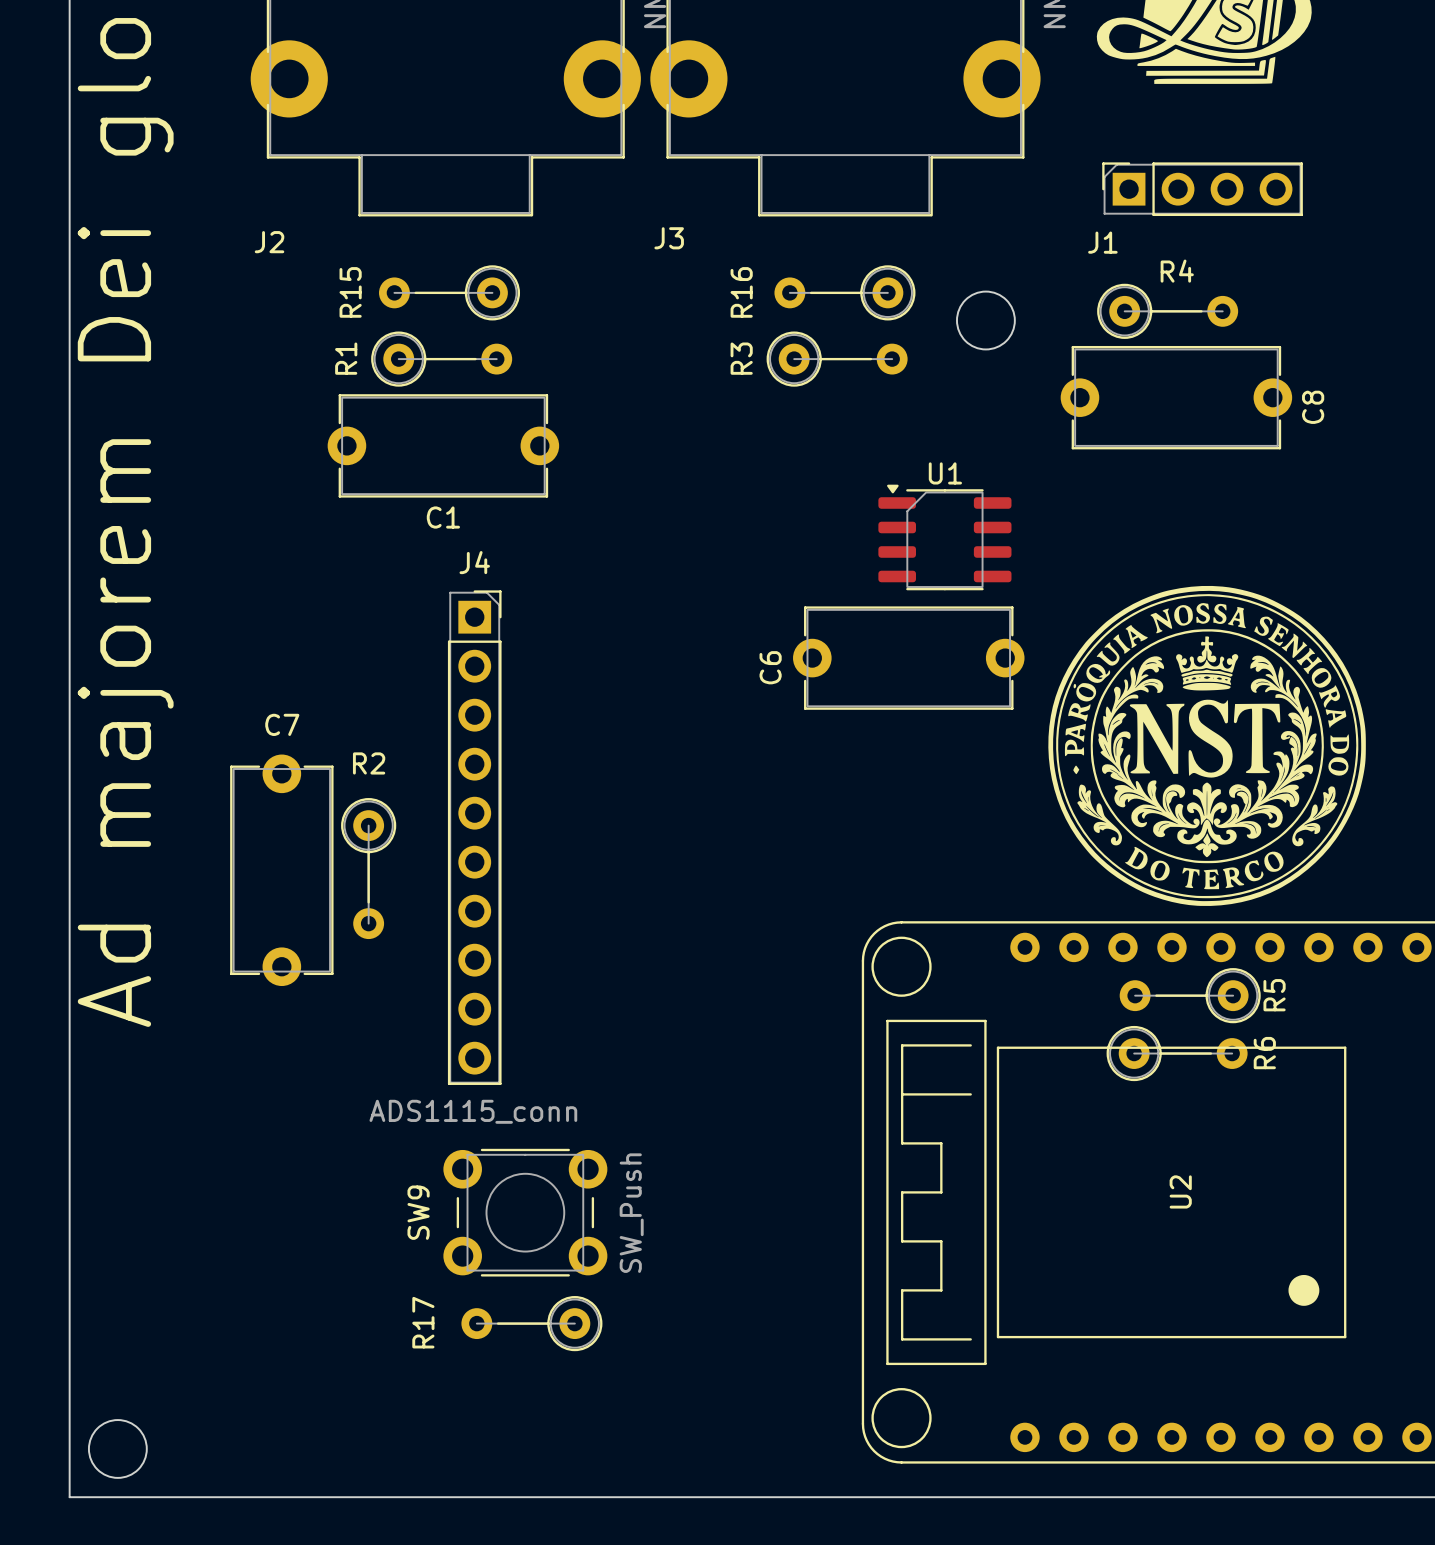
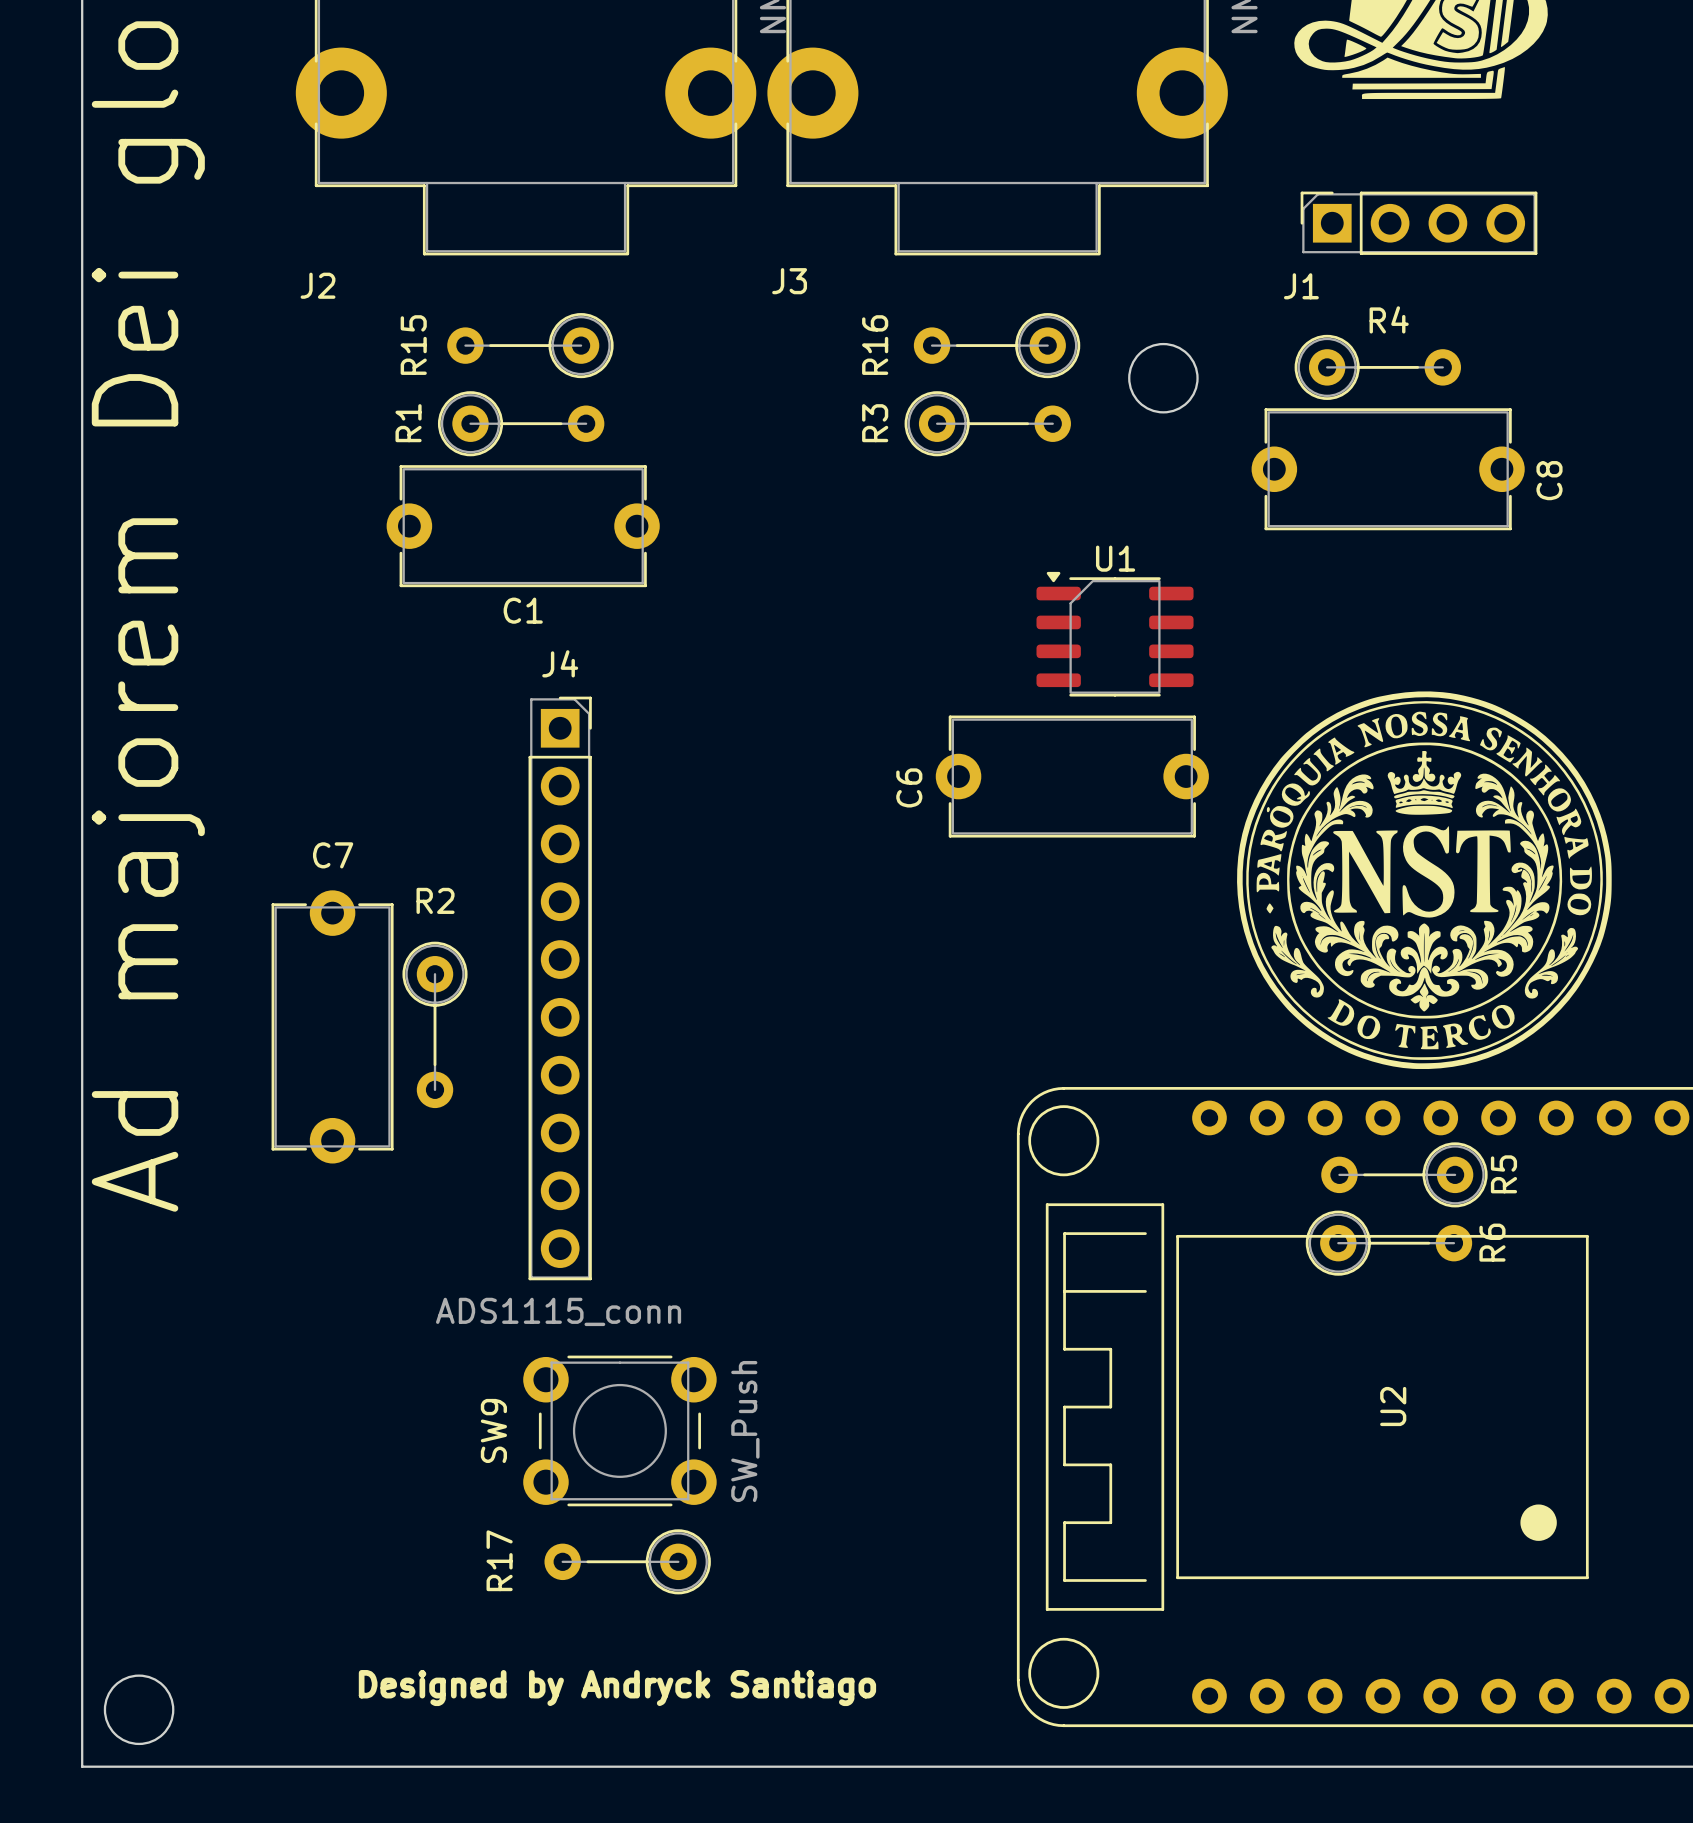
text: none -> Designed by Andryck Santiago (617, 1688)

